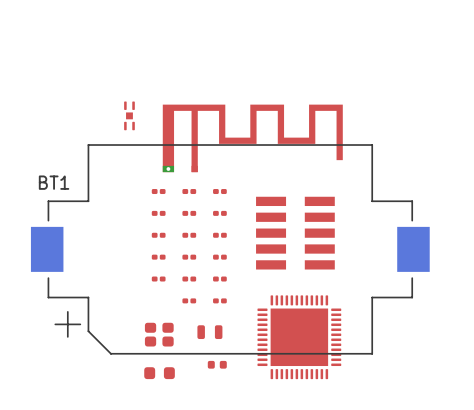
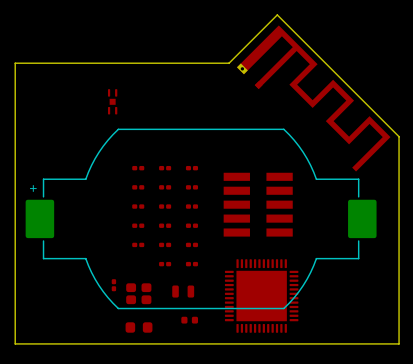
board edge: none -> (277, 14) (229, 63) (15, 63) (15, 343) (399, 343) (399, 136) (277, 14)
part: none -> (313, 98)
part: (252, 138) -> none
BT1: (230, 249) -> none
part: none -> (201, 218)
part: none -> (113, 285)

